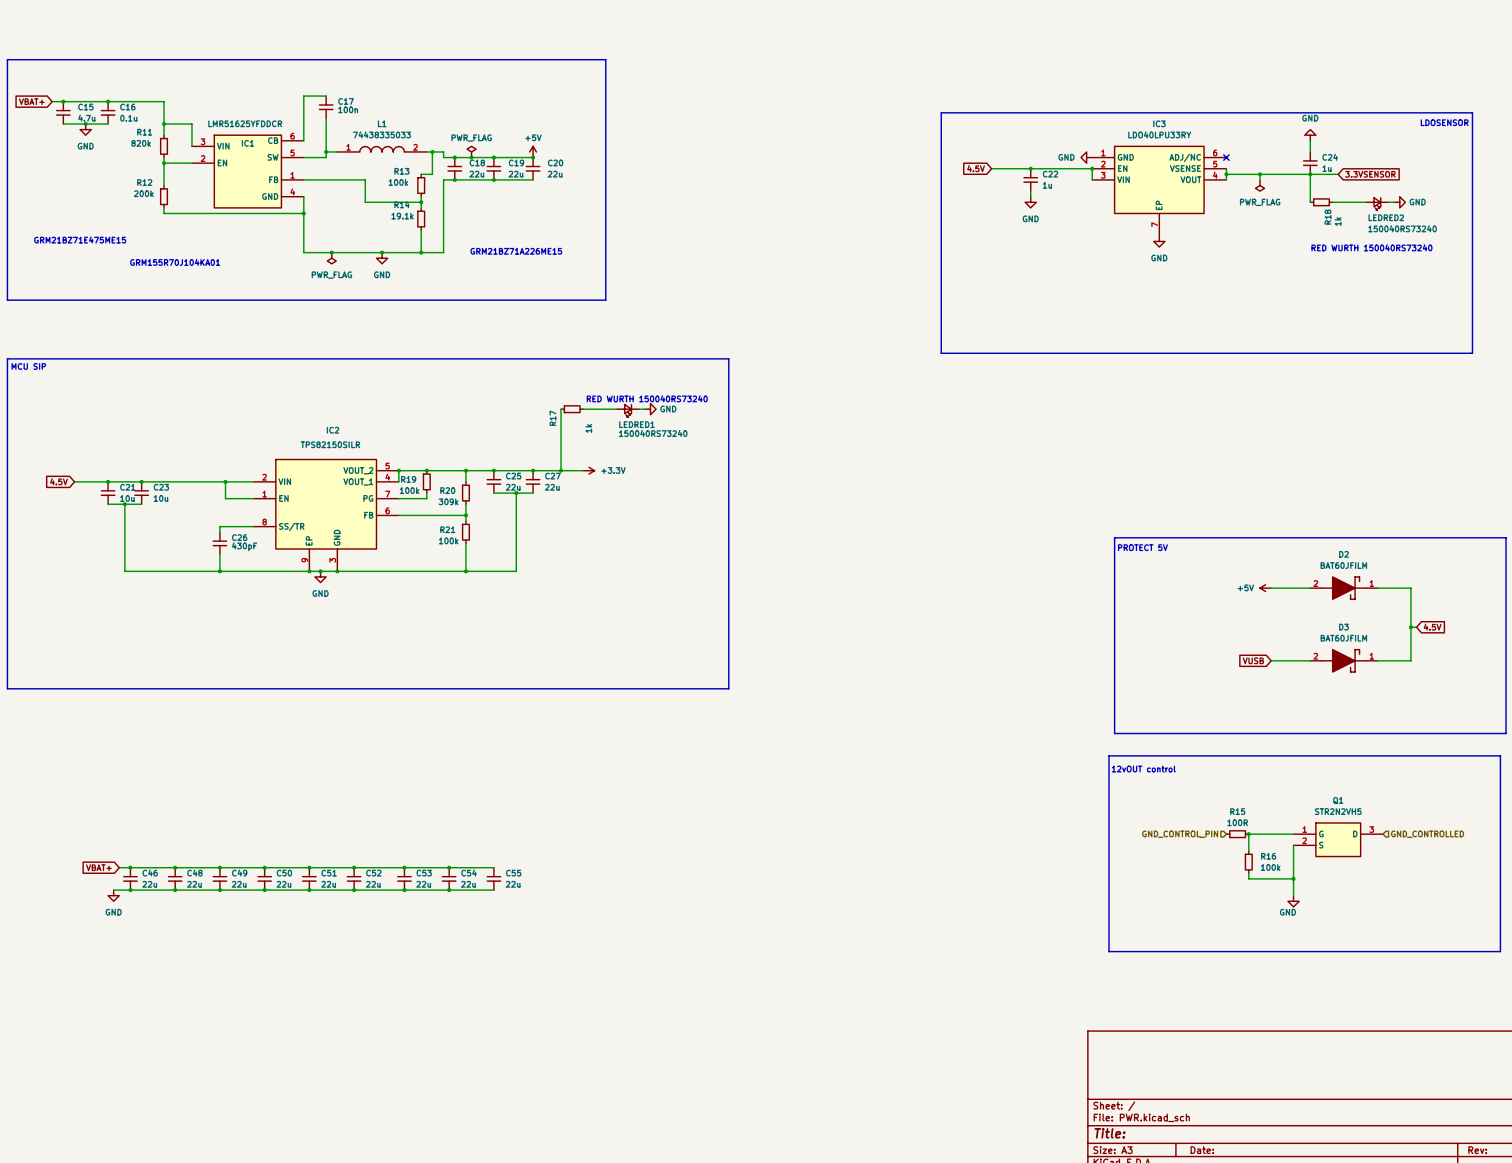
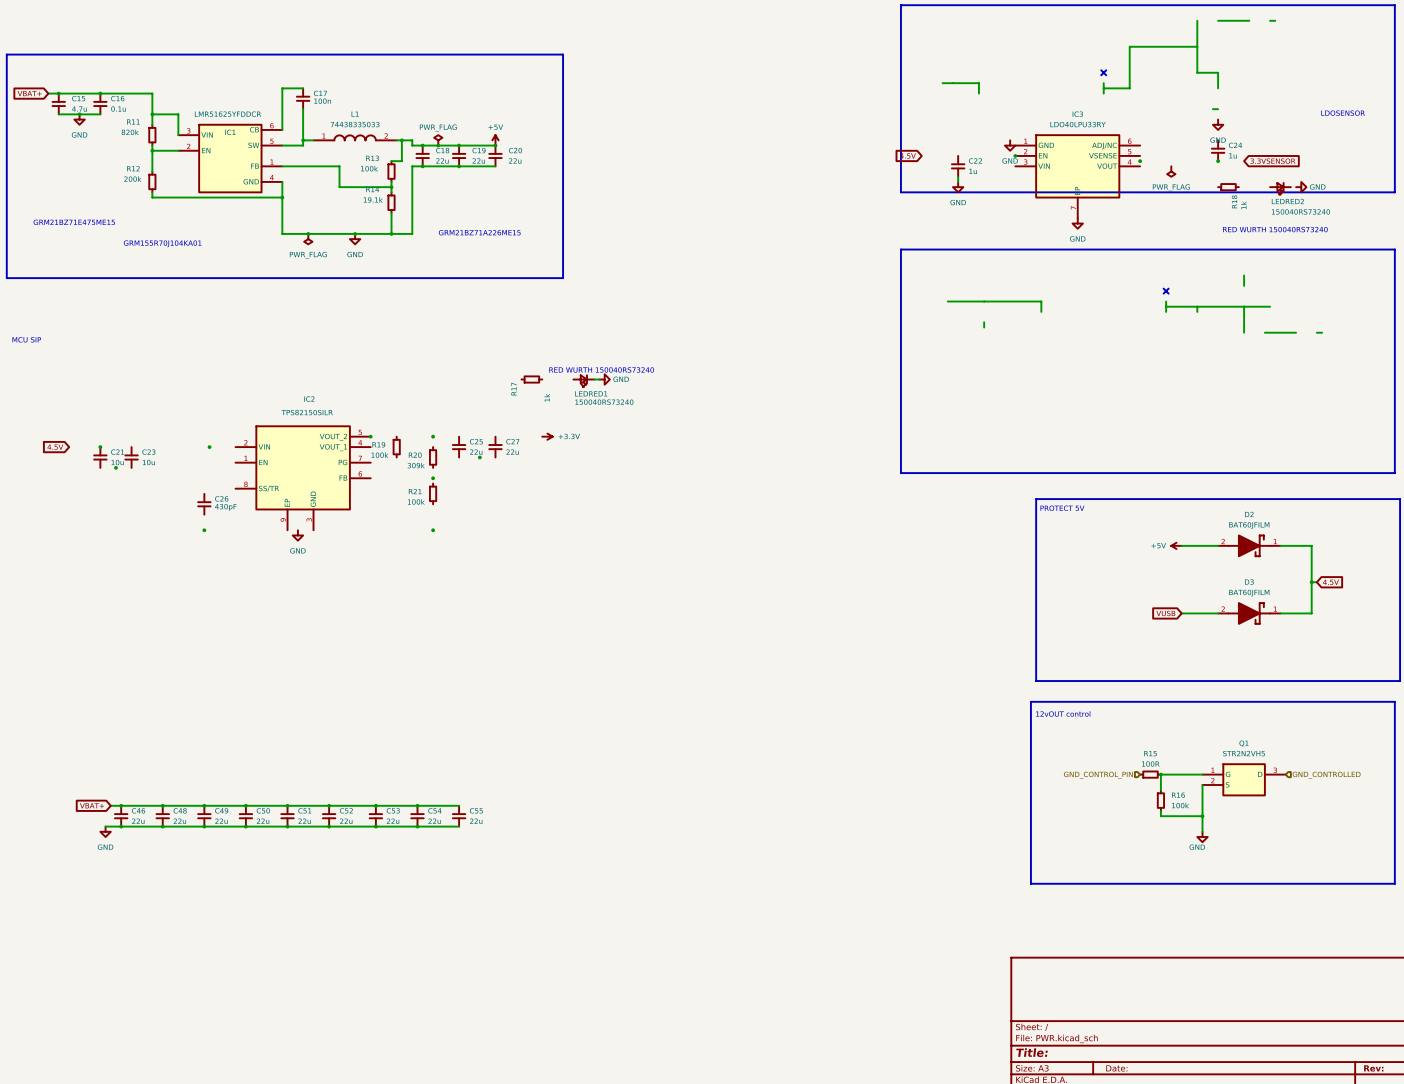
line: none -> (900, 5) (1394, 5) (1394, 192) (900, 192) (900, 5)
wire: none -> (1197, 20) (1197, 72) (1218, 72) (1218, 88)
wire: none -> (1218, 20) (1249, 20)
wire: none -> (1270, 20) (1275, 20)
wire: none -> (1197, 46) (1129, 46) (1129, 88) (1103, 88)
no-connect mark: none -> (1103, 72)
wire: none -> (942, 83) (978, 83) (978, 93)
line: (941, 112) (1472, 112) (1472, 353) (941, 353) (941, 112) -> none
wire: none -> (1212, 109) (1218, 109)
power symbol rotation: 0° (1310, 135) -> 180° (1218, 124)
wire: (1310, 140) (1310, 151) -> none
power symbol rotation: 0° (1086, 157) -> 90° counterclockwise (1010, 145)
no-connect mark: (1226, 157) -> none
wire: (991, 168) (1092, 168) (1092, 179) -> none
junction: (1030, 168) -> none
wire: (1226, 168) (1226, 179) -> (1103, 83) (1103, 93)
wire: (1226, 174) (1338, 174) -> none
wire: (1259, 174) (1259, 179) -> none
junction: (1259, 174) -> none
wire: (1310, 174) (1310, 202) -> none
wire: (1332, 202) (1366, 202) -> none
wire: (1388, 202) (1394, 202) -> none
line: none -> (900, 249) (900, 473) (1394, 473) (1394, 249) (900, 249)
wire: none -> (1244, 275) (1244, 285)
no-connect mark: none -> (1166, 291)
wire: none -> (947, 301) (1041, 301) (1041, 311)
wire: none -> (1166, 301) (1166, 311)
wire: none -> (1166, 306) (1270, 306)
wire: none -> (1197, 306) (1197, 311)
wire: none -> (1244, 306) (1244, 332)
wire: none -> (984, 322) (984, 327)
line: (7, 358) (7, 688) (728, 688) (728, 358) (7, 358) -> none
wire: none -> (1264, 332) (1296, 332)
wire: none -> (1316, 332) (1322, 332)
wire: (561, 409) (561, 470) -> none
wire: (583, 409) (616, 409) -> none
junction: (426, 470) -> none
wire: (465, 470) (465, 481) -> none
junction: (493, 470) -> none
junction: (533, 470) -> none
junction: (561, 470) -> none
wire: (583, 470) (398, 470) (398, 481) -> none
wire: (74, 481) (253, 481) -> none
junction: (141, 481) -> none
wire: (225, 481) (225, 498) (253, 498) -> none
wire: (426, 493) (426, 498) (398, 498) -> none
wire: (493, 493) (533, 493) -> none
wire: (516, 493) (516, 571) (124, 571) (124, 504) -> none
wire: (108, 504) (141, 504) -> none
wire: (465, 504) (465, 521) -> none
wire: (398, 515) (465, 515) -> none
wire: (253, 526) (219, 526) (219, 532) -> none
wire: (465, 543) (465, 571) -> none
wire: (219, 554) (219, 571) -> none
junction: (309, 571) -> none
junction: (320, 571) -> none
junction: (337, 571) -> none

